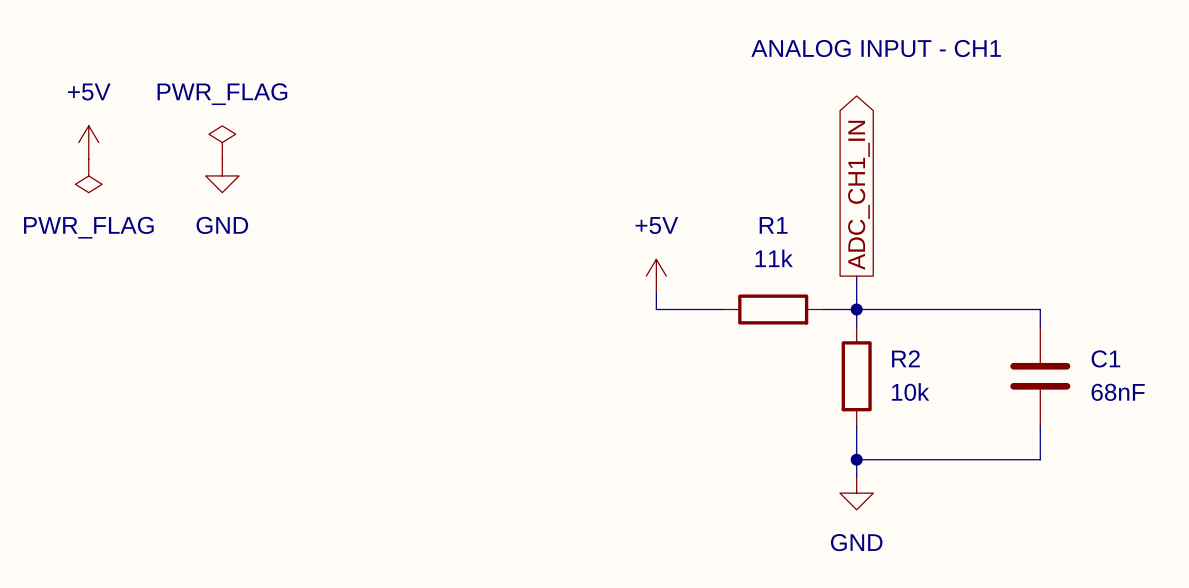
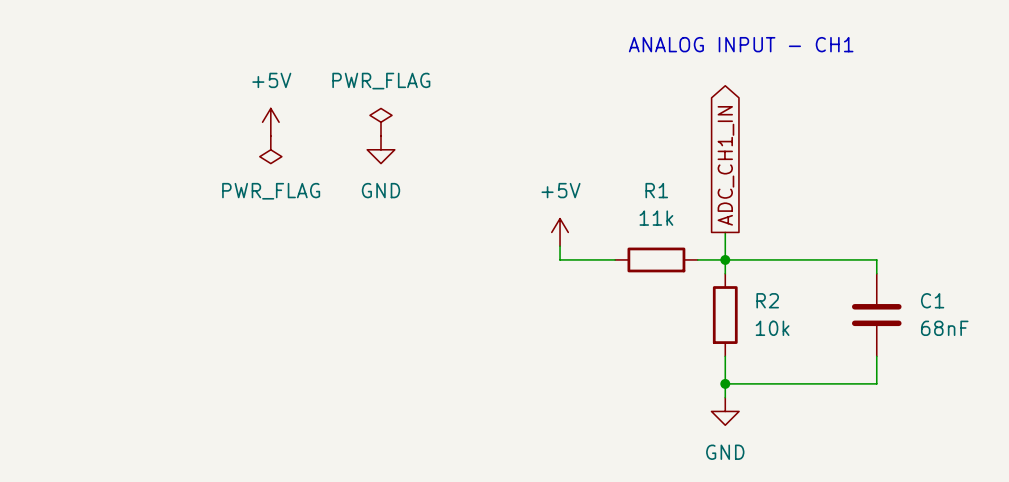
power symbol position: +5V (88, 142) -> +5V (270, 122)
power symbol rotation: 0° (222, 142) -> 180° (270, 149)
power symbol position: PWR_FLAG (222, 142) -> PWR_FLAG (270, 149)
power symbol: none -> PWR_FLAG (381, 122)
power symbol: PWR_FLAG (88, 175) -> none
power symbol position: GND (222, 175) -> GND (381, 149)

